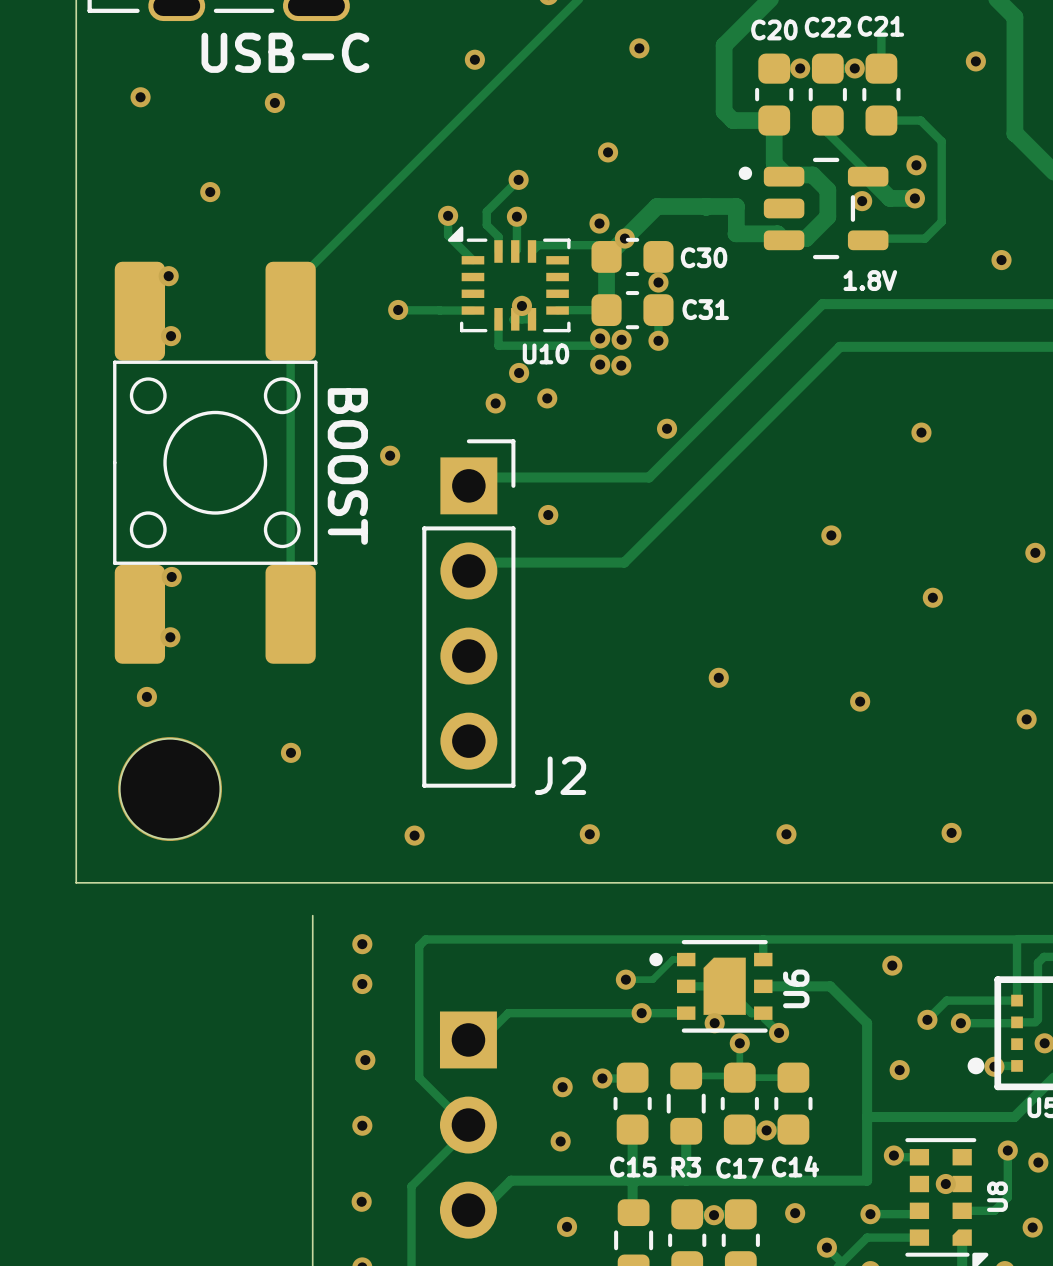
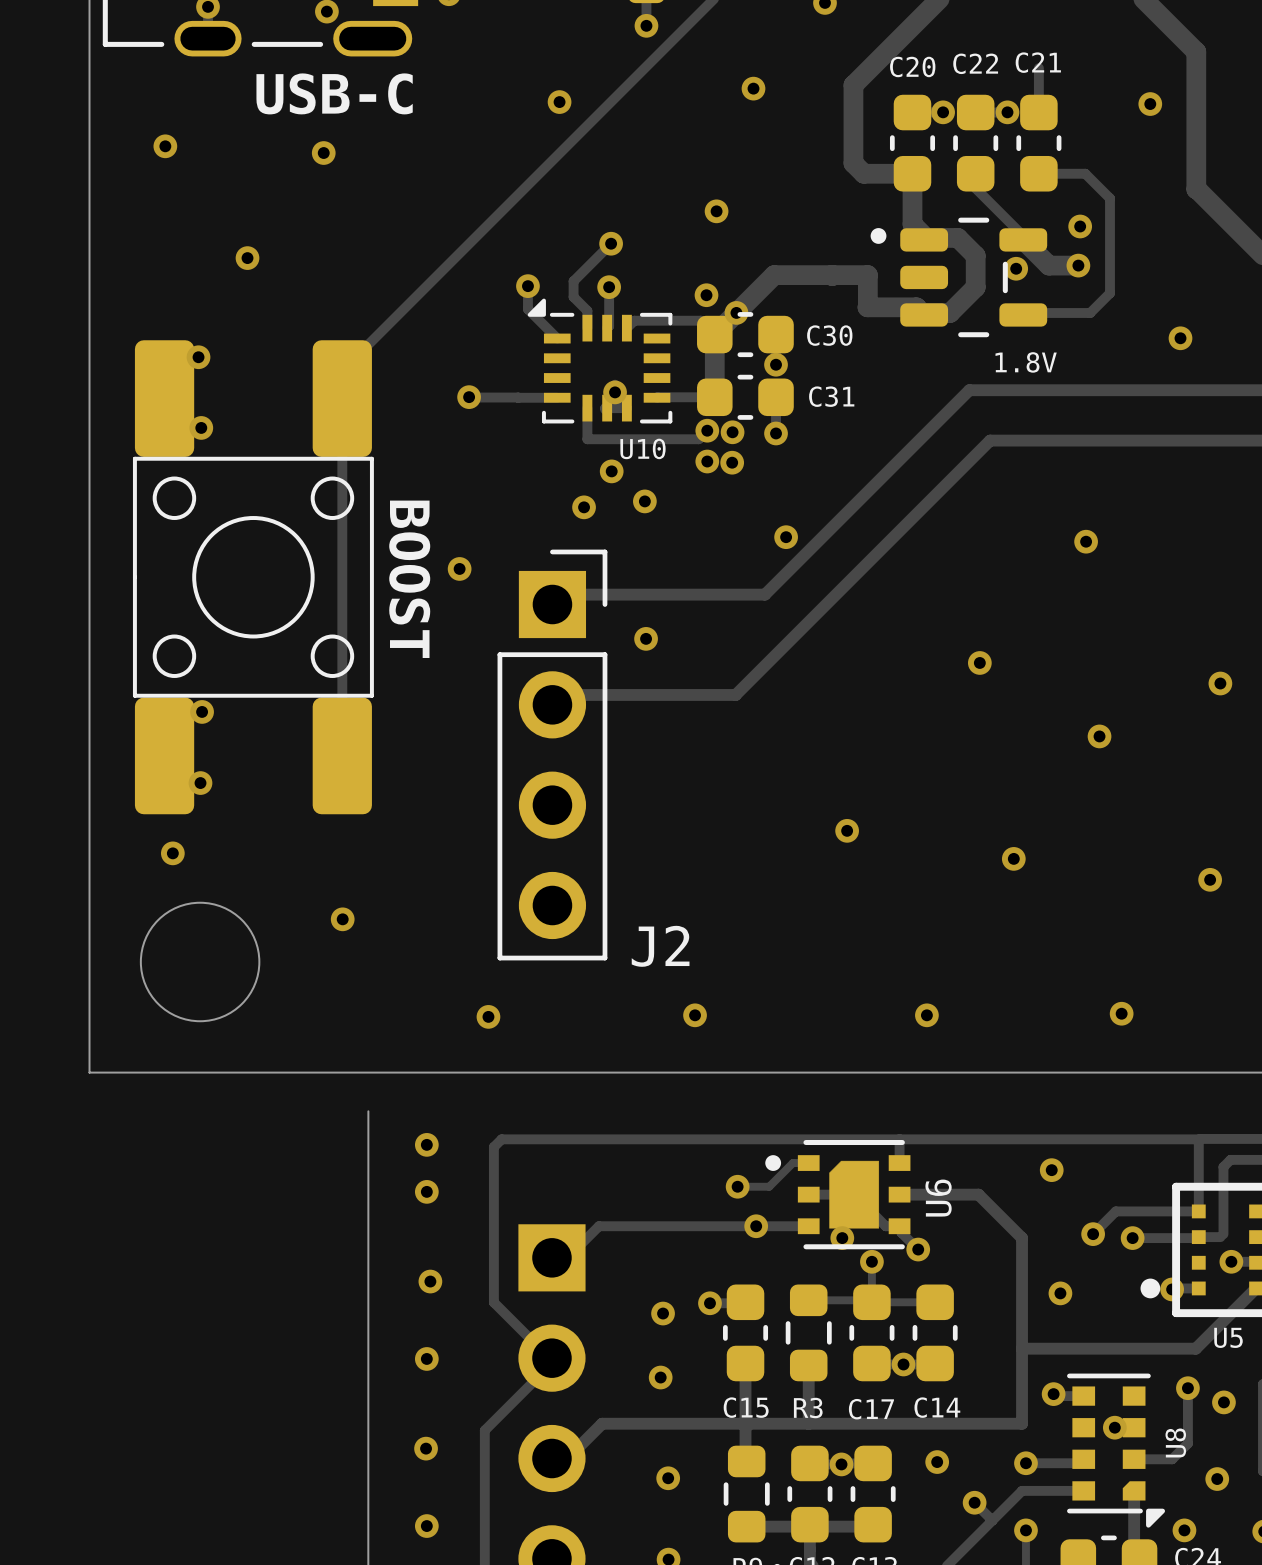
via: (170, 789) -> none

